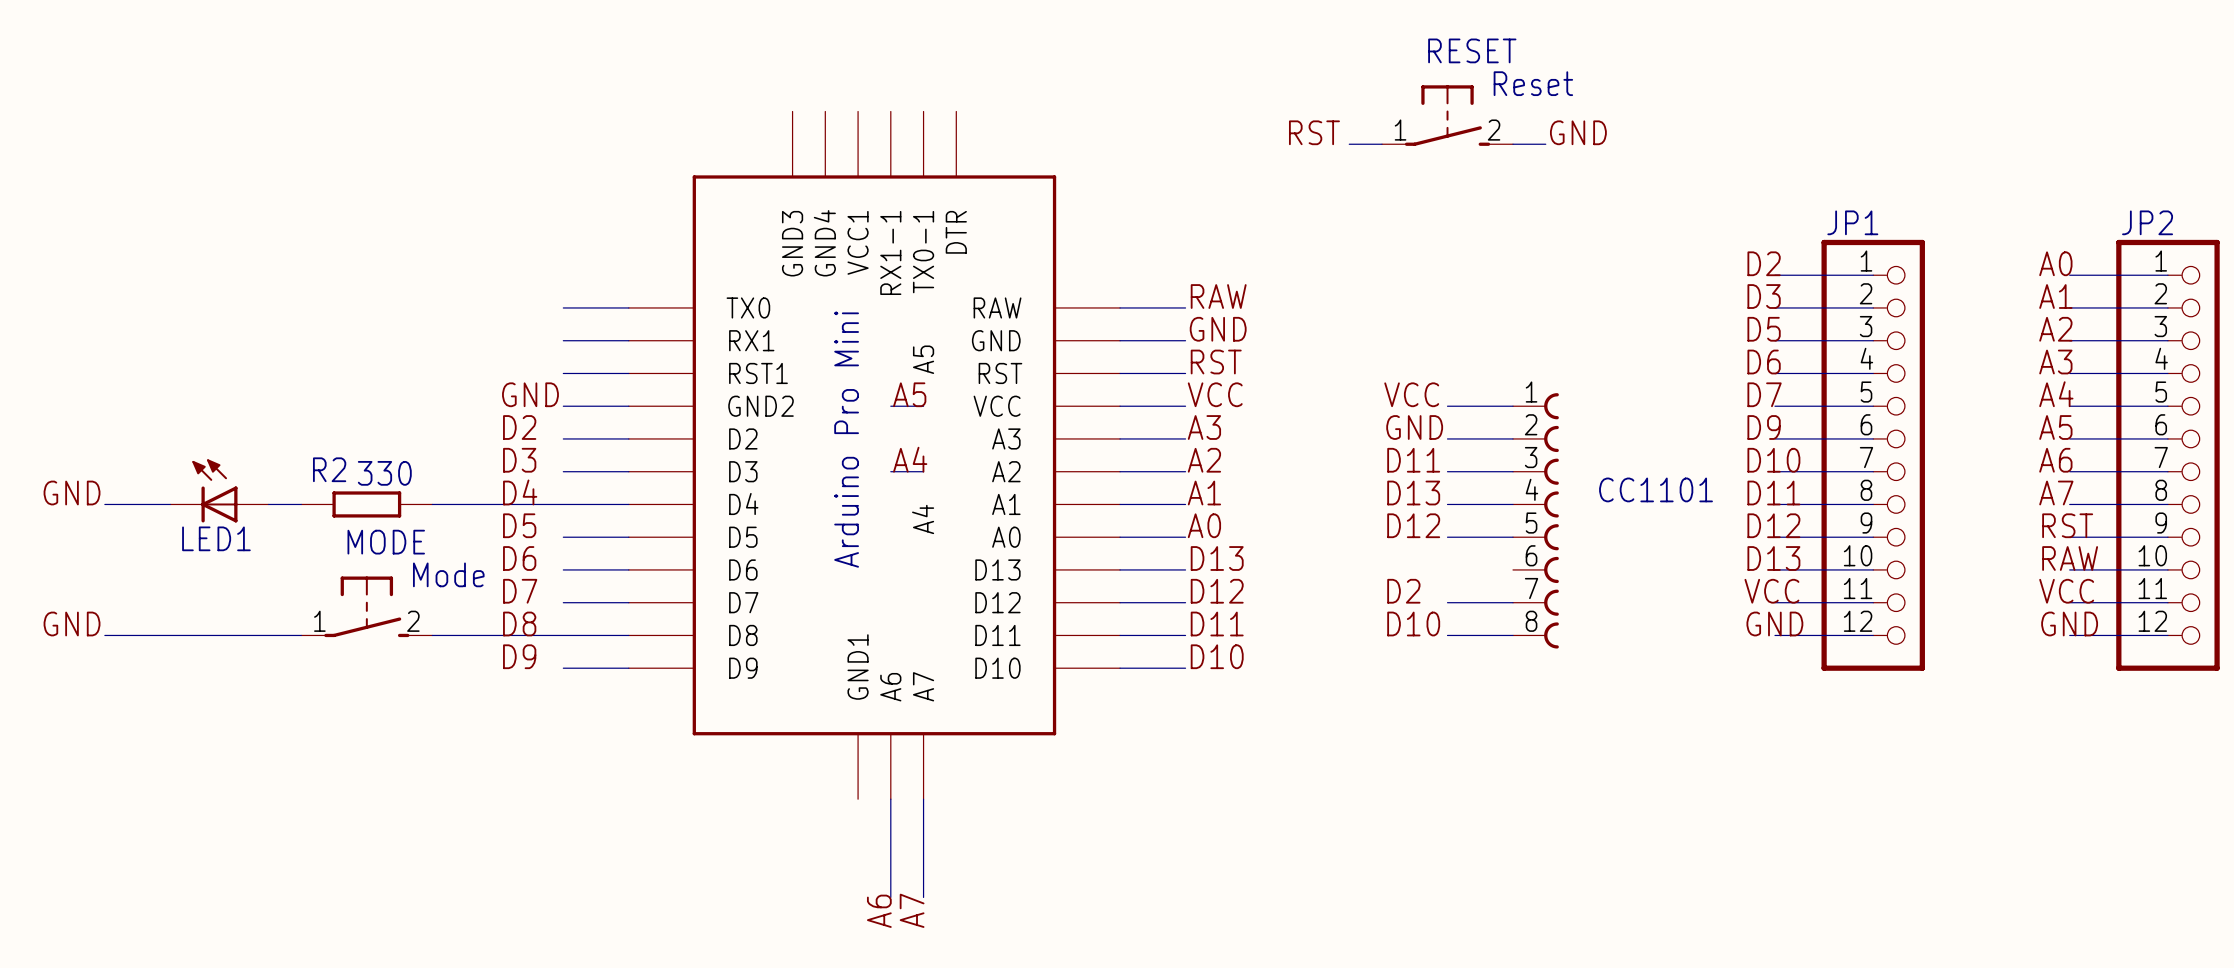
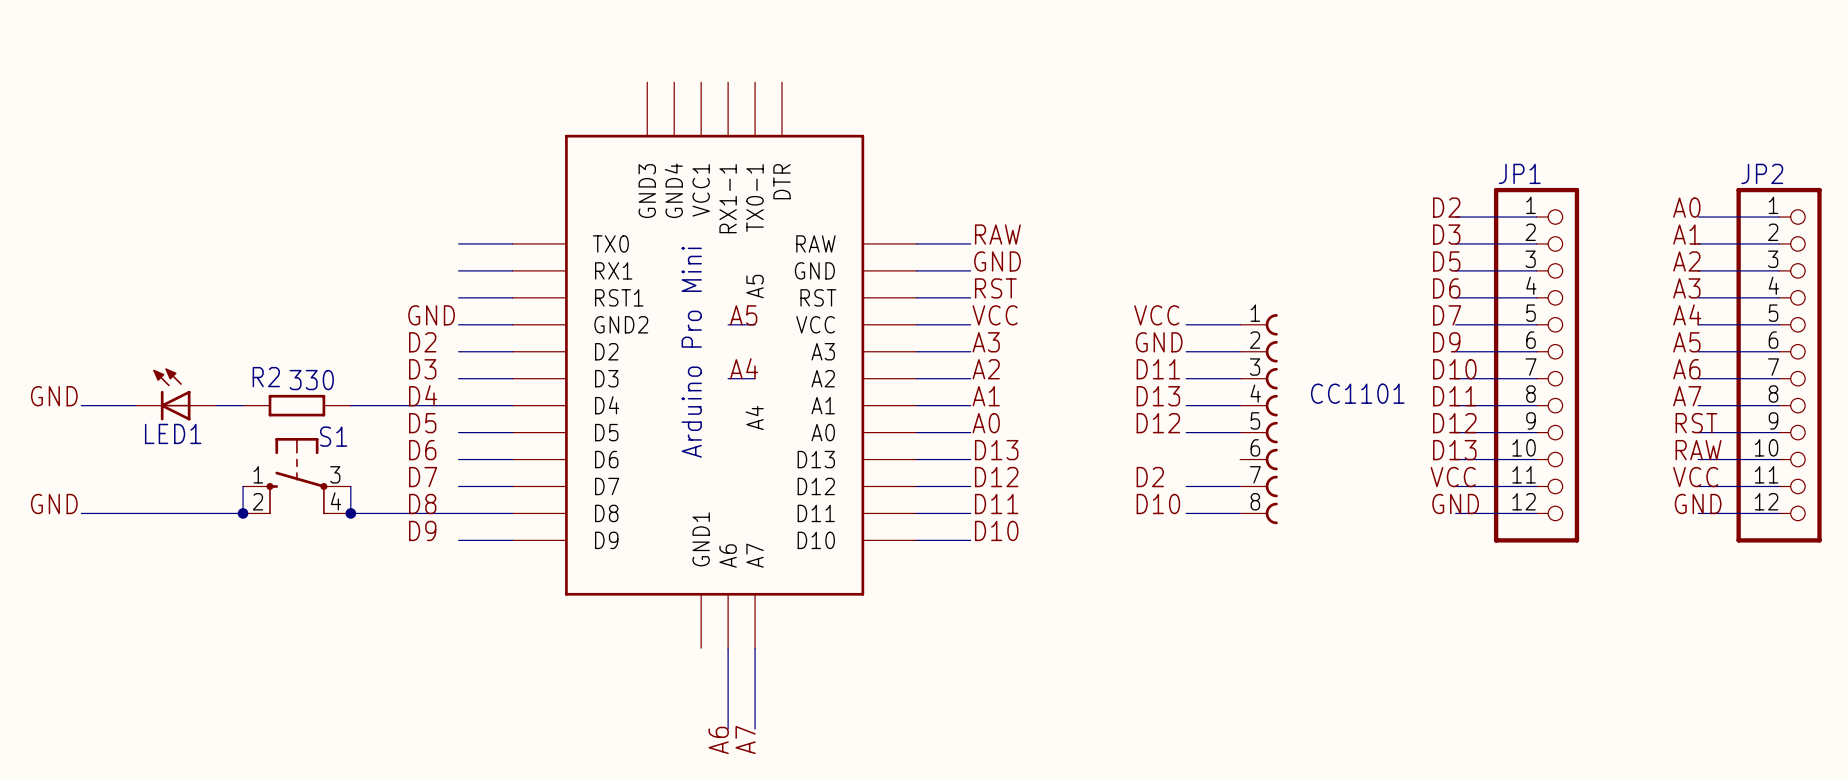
RESET: Reset (1447, 115) -> none
label: RST (1314, 132) -> none
label: GND (1578, 132) -> none
wire: (1349, 144) (1382, 144) -> none
wire: (1513, 144) (1545, 144) -> none
S1: none -> (296, 476)
wire: none -> (243, 486) (243, 513)
wire: none -> (350, 486) (350, 513)
MODE: Mode (366, 606) -> none
junction: none -> (243, 513)
junction: none -> (350, 513)

